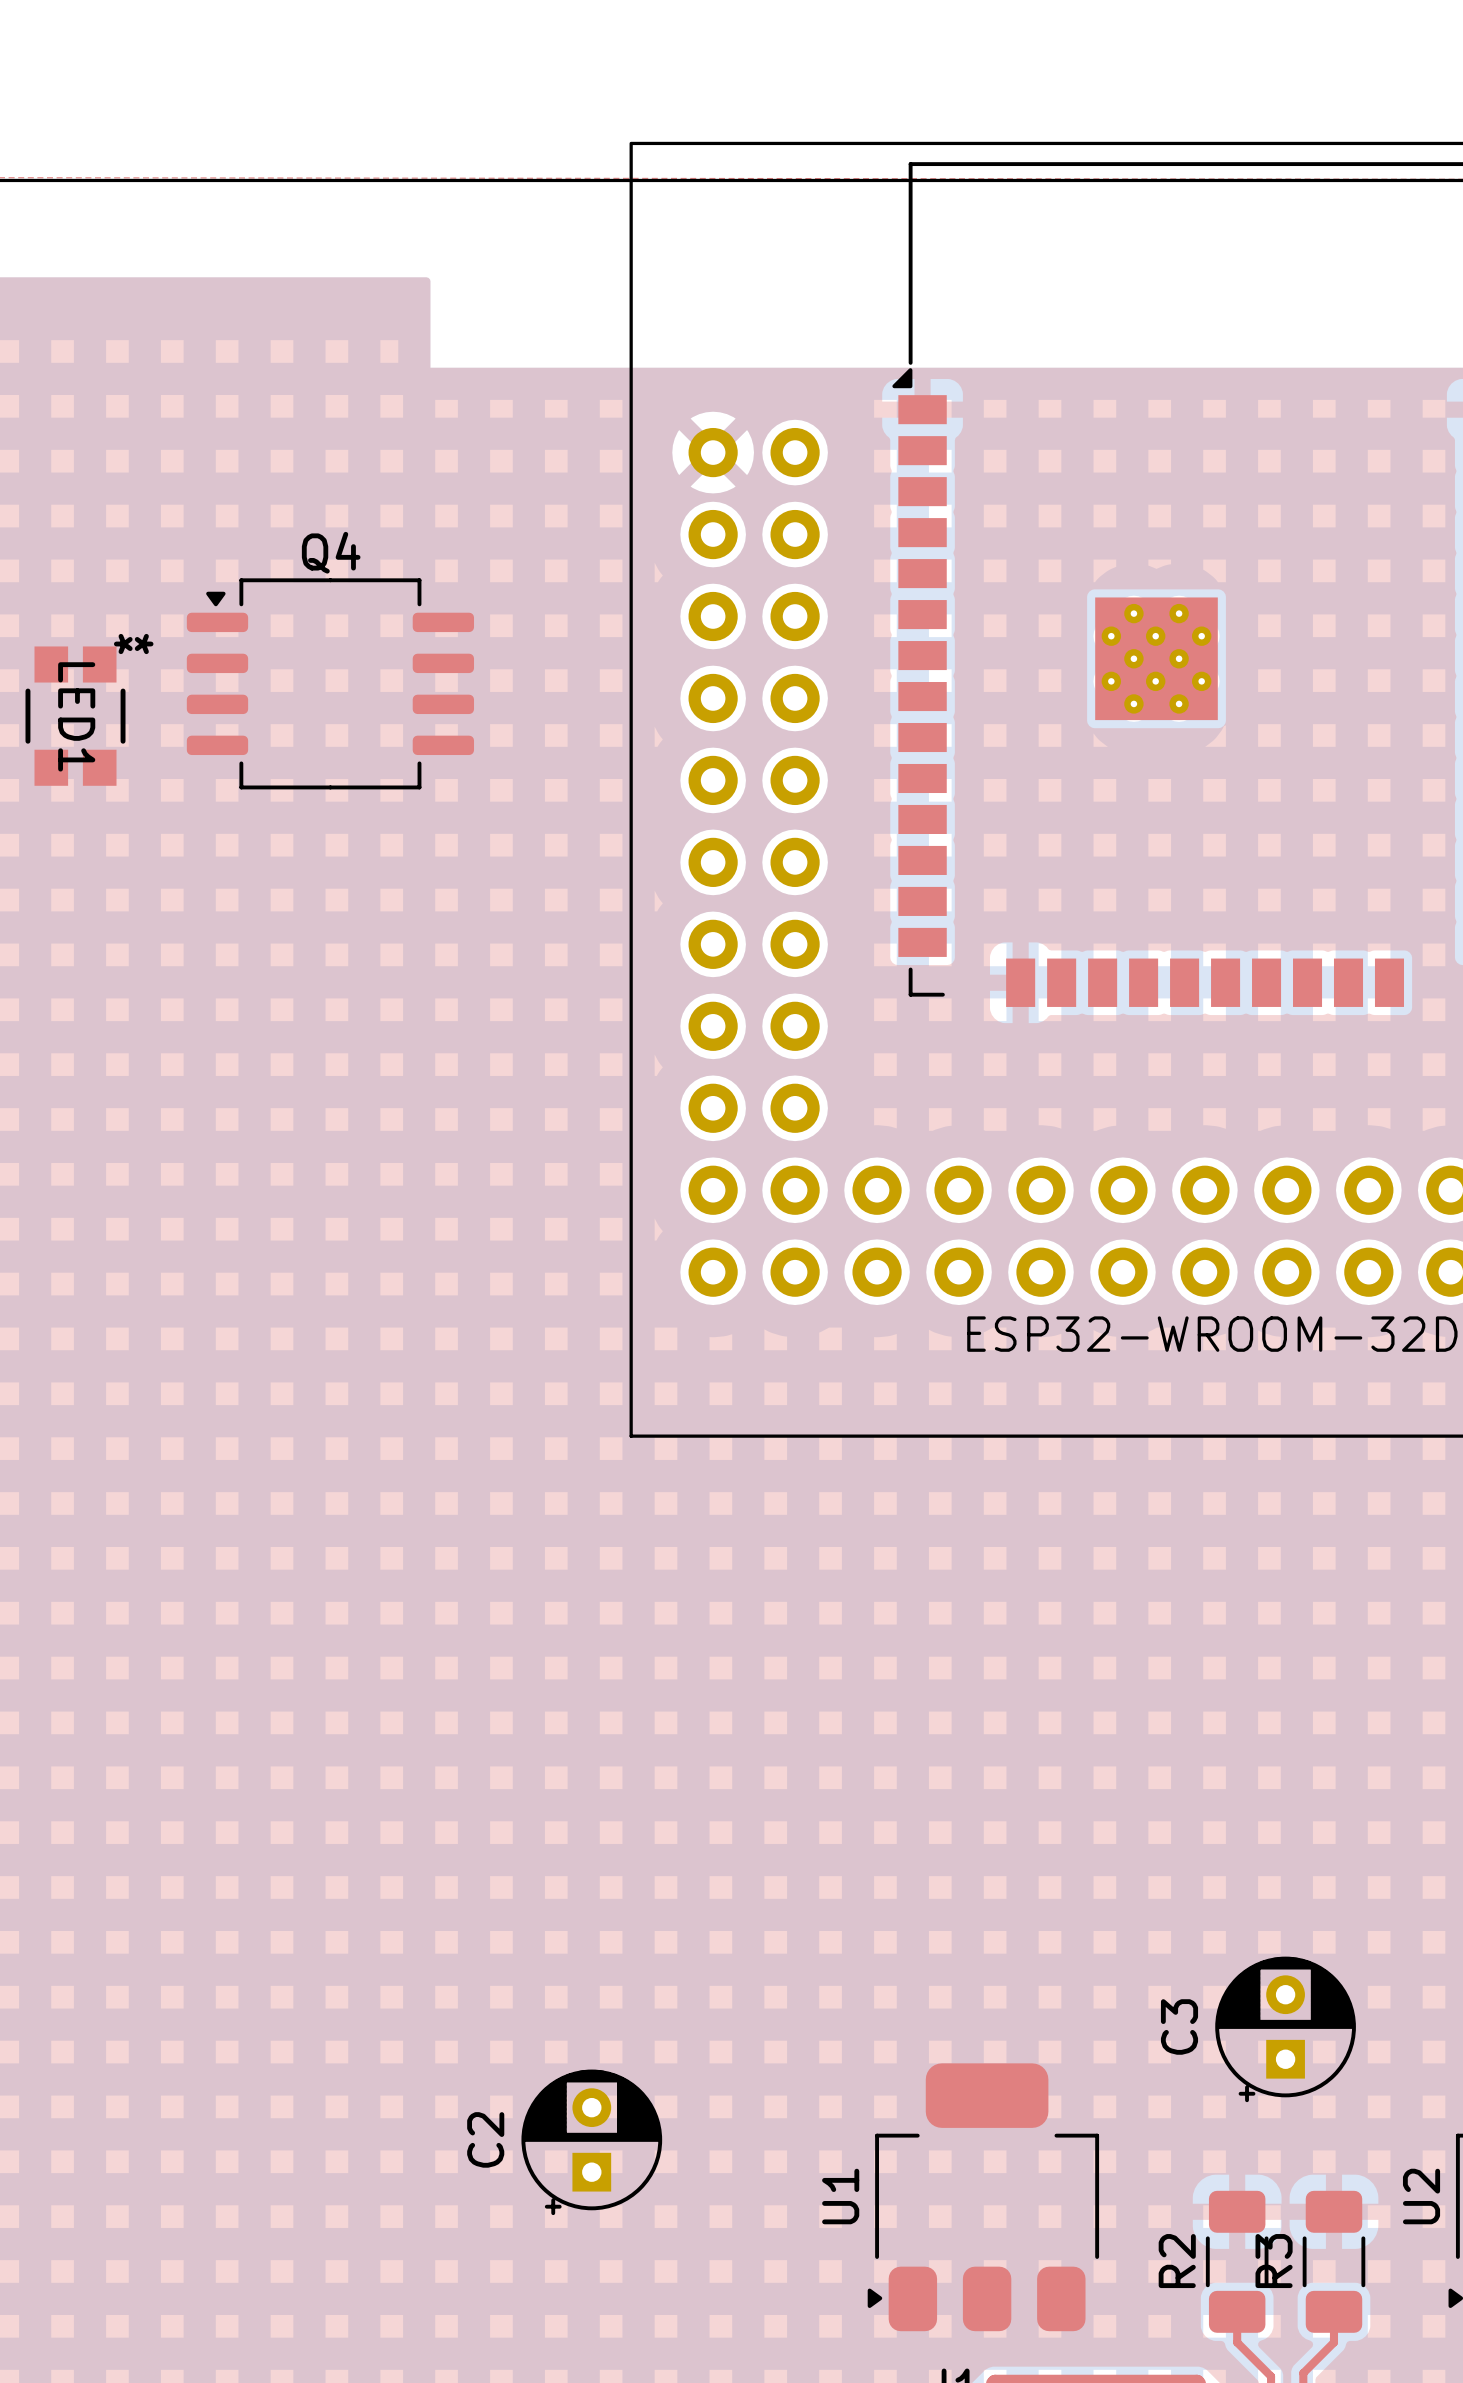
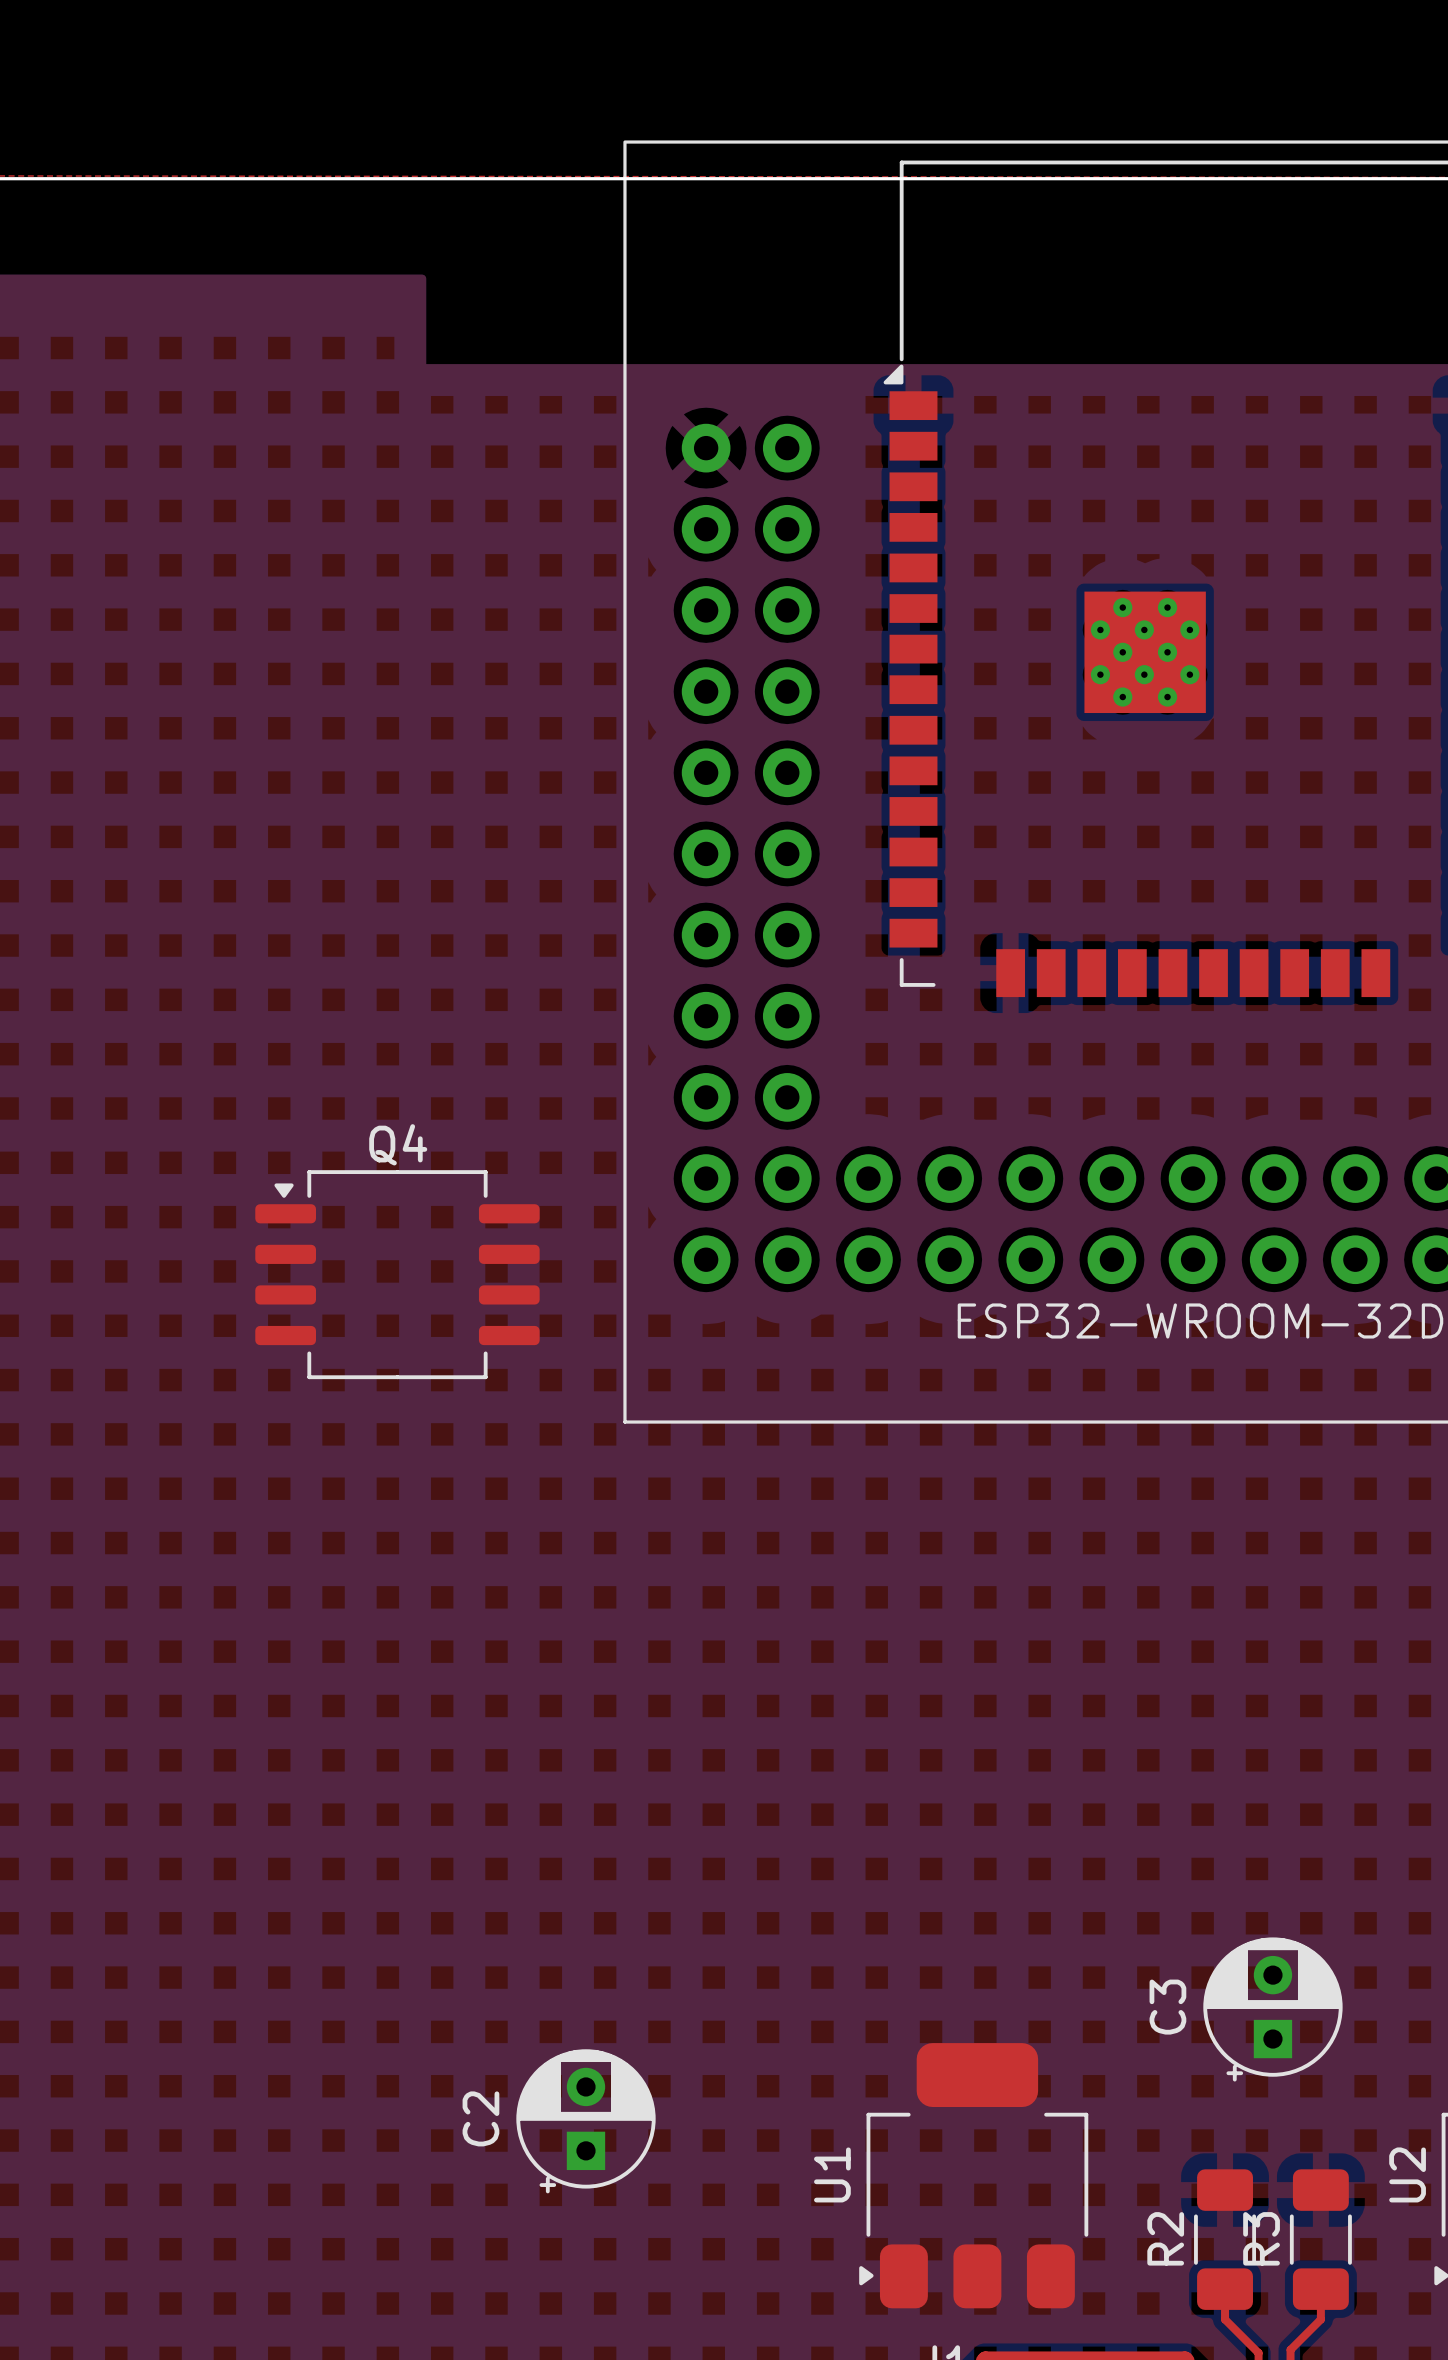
Q4 position: (330, 683) -> (397, 1274)
LED1: (75, 716) -> none

